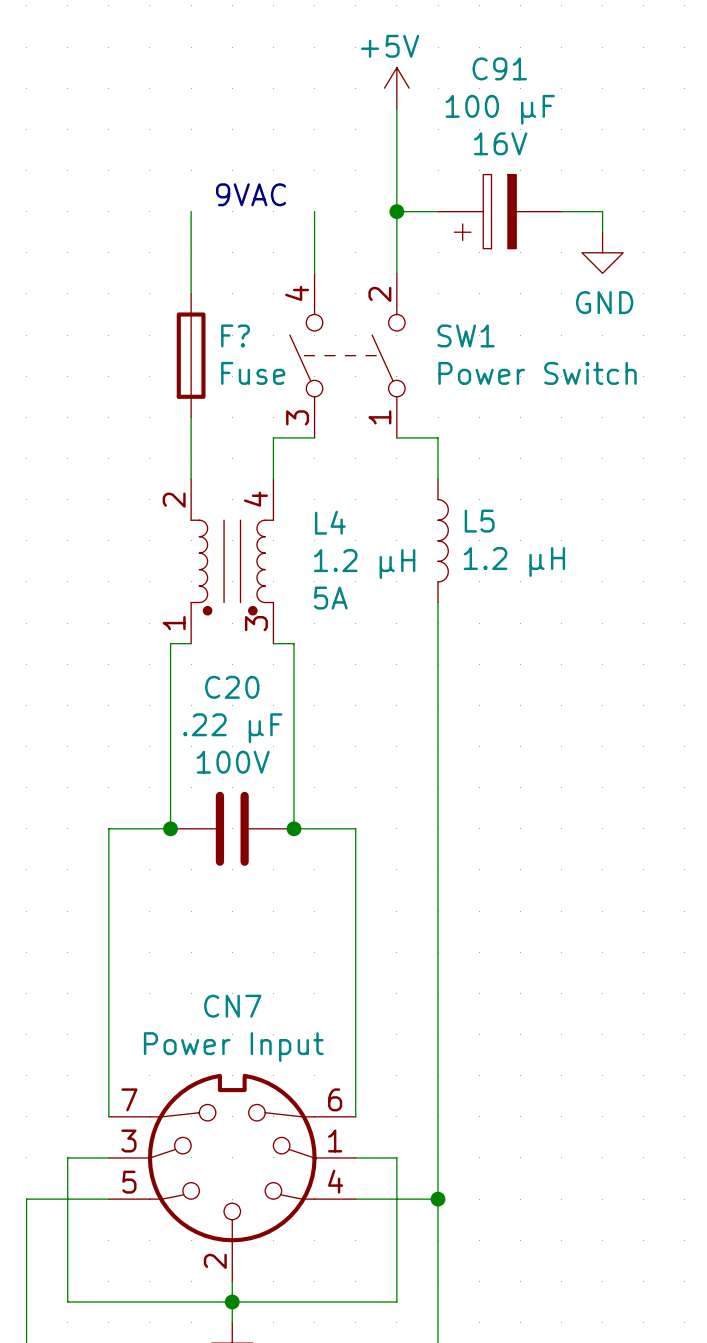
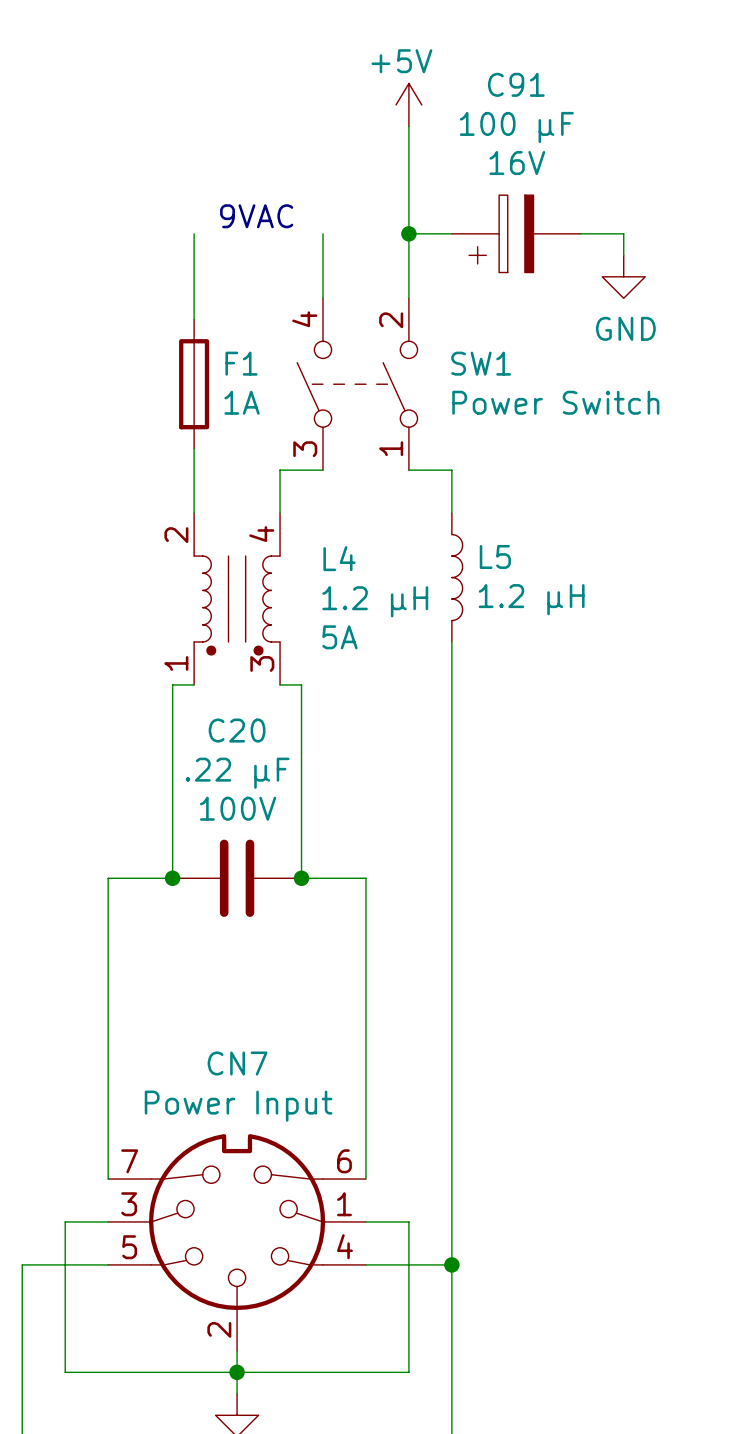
F? name: F? (235, 335) -> F1 (241, 363)
F? value: Fuse (253, 373) -> 1A (242, 402)

